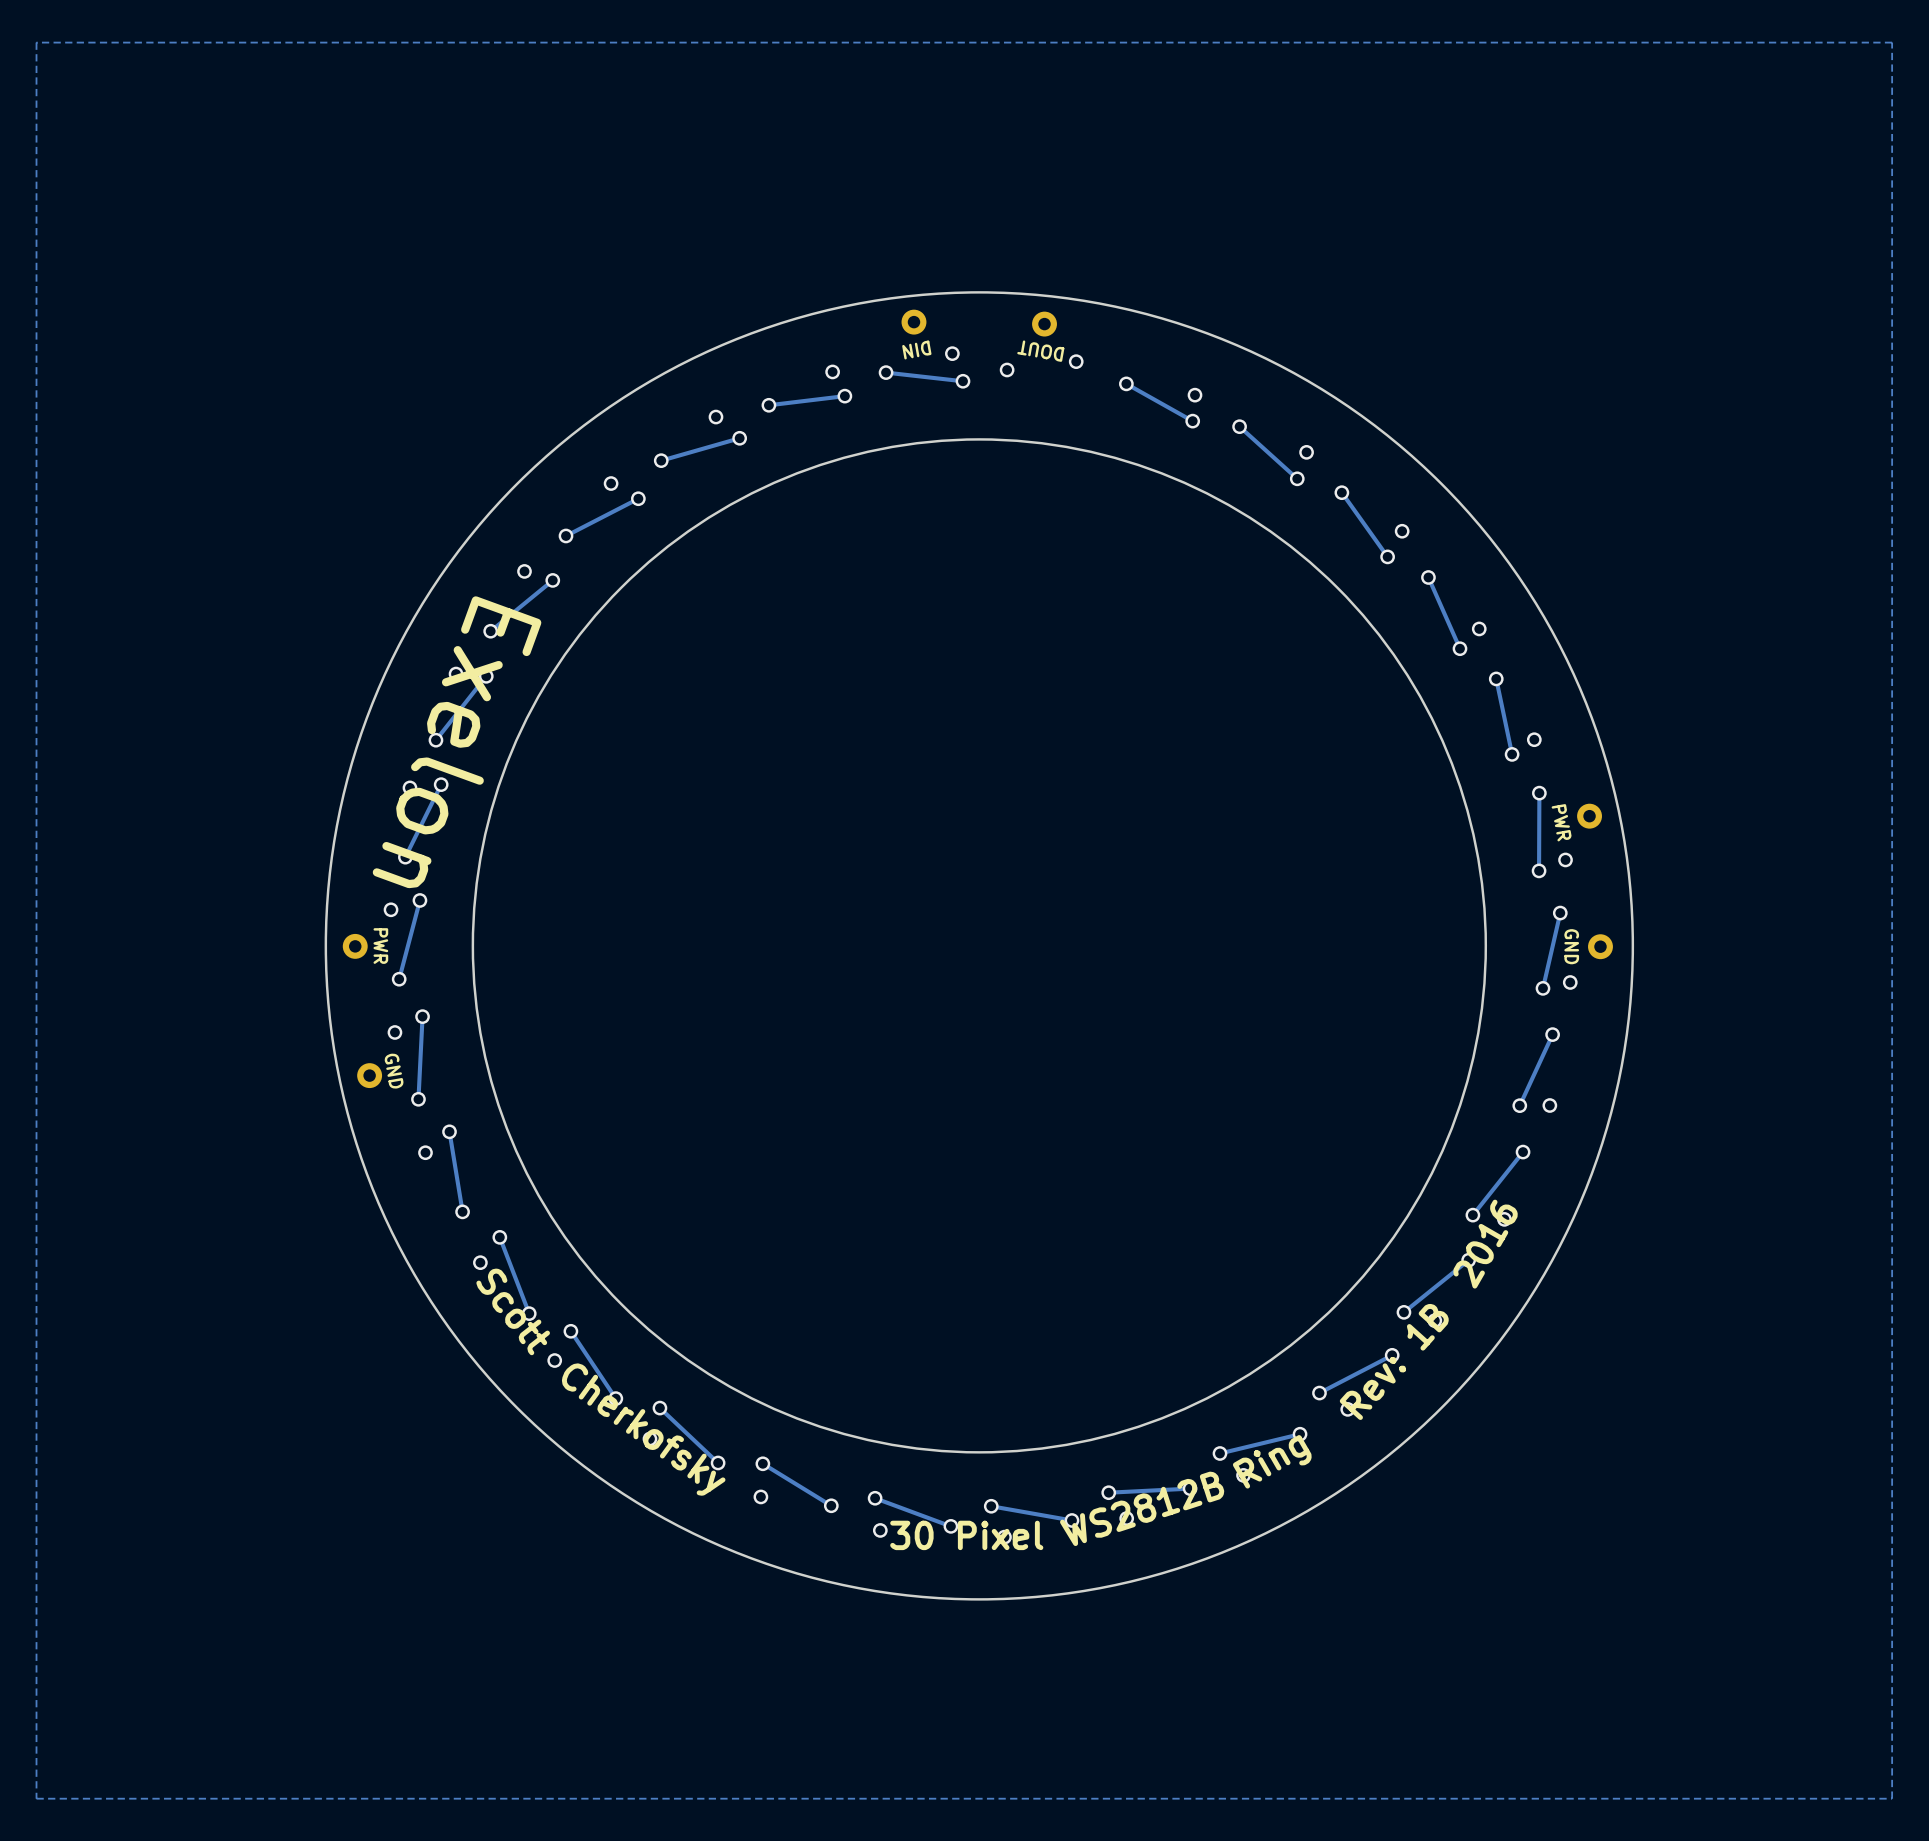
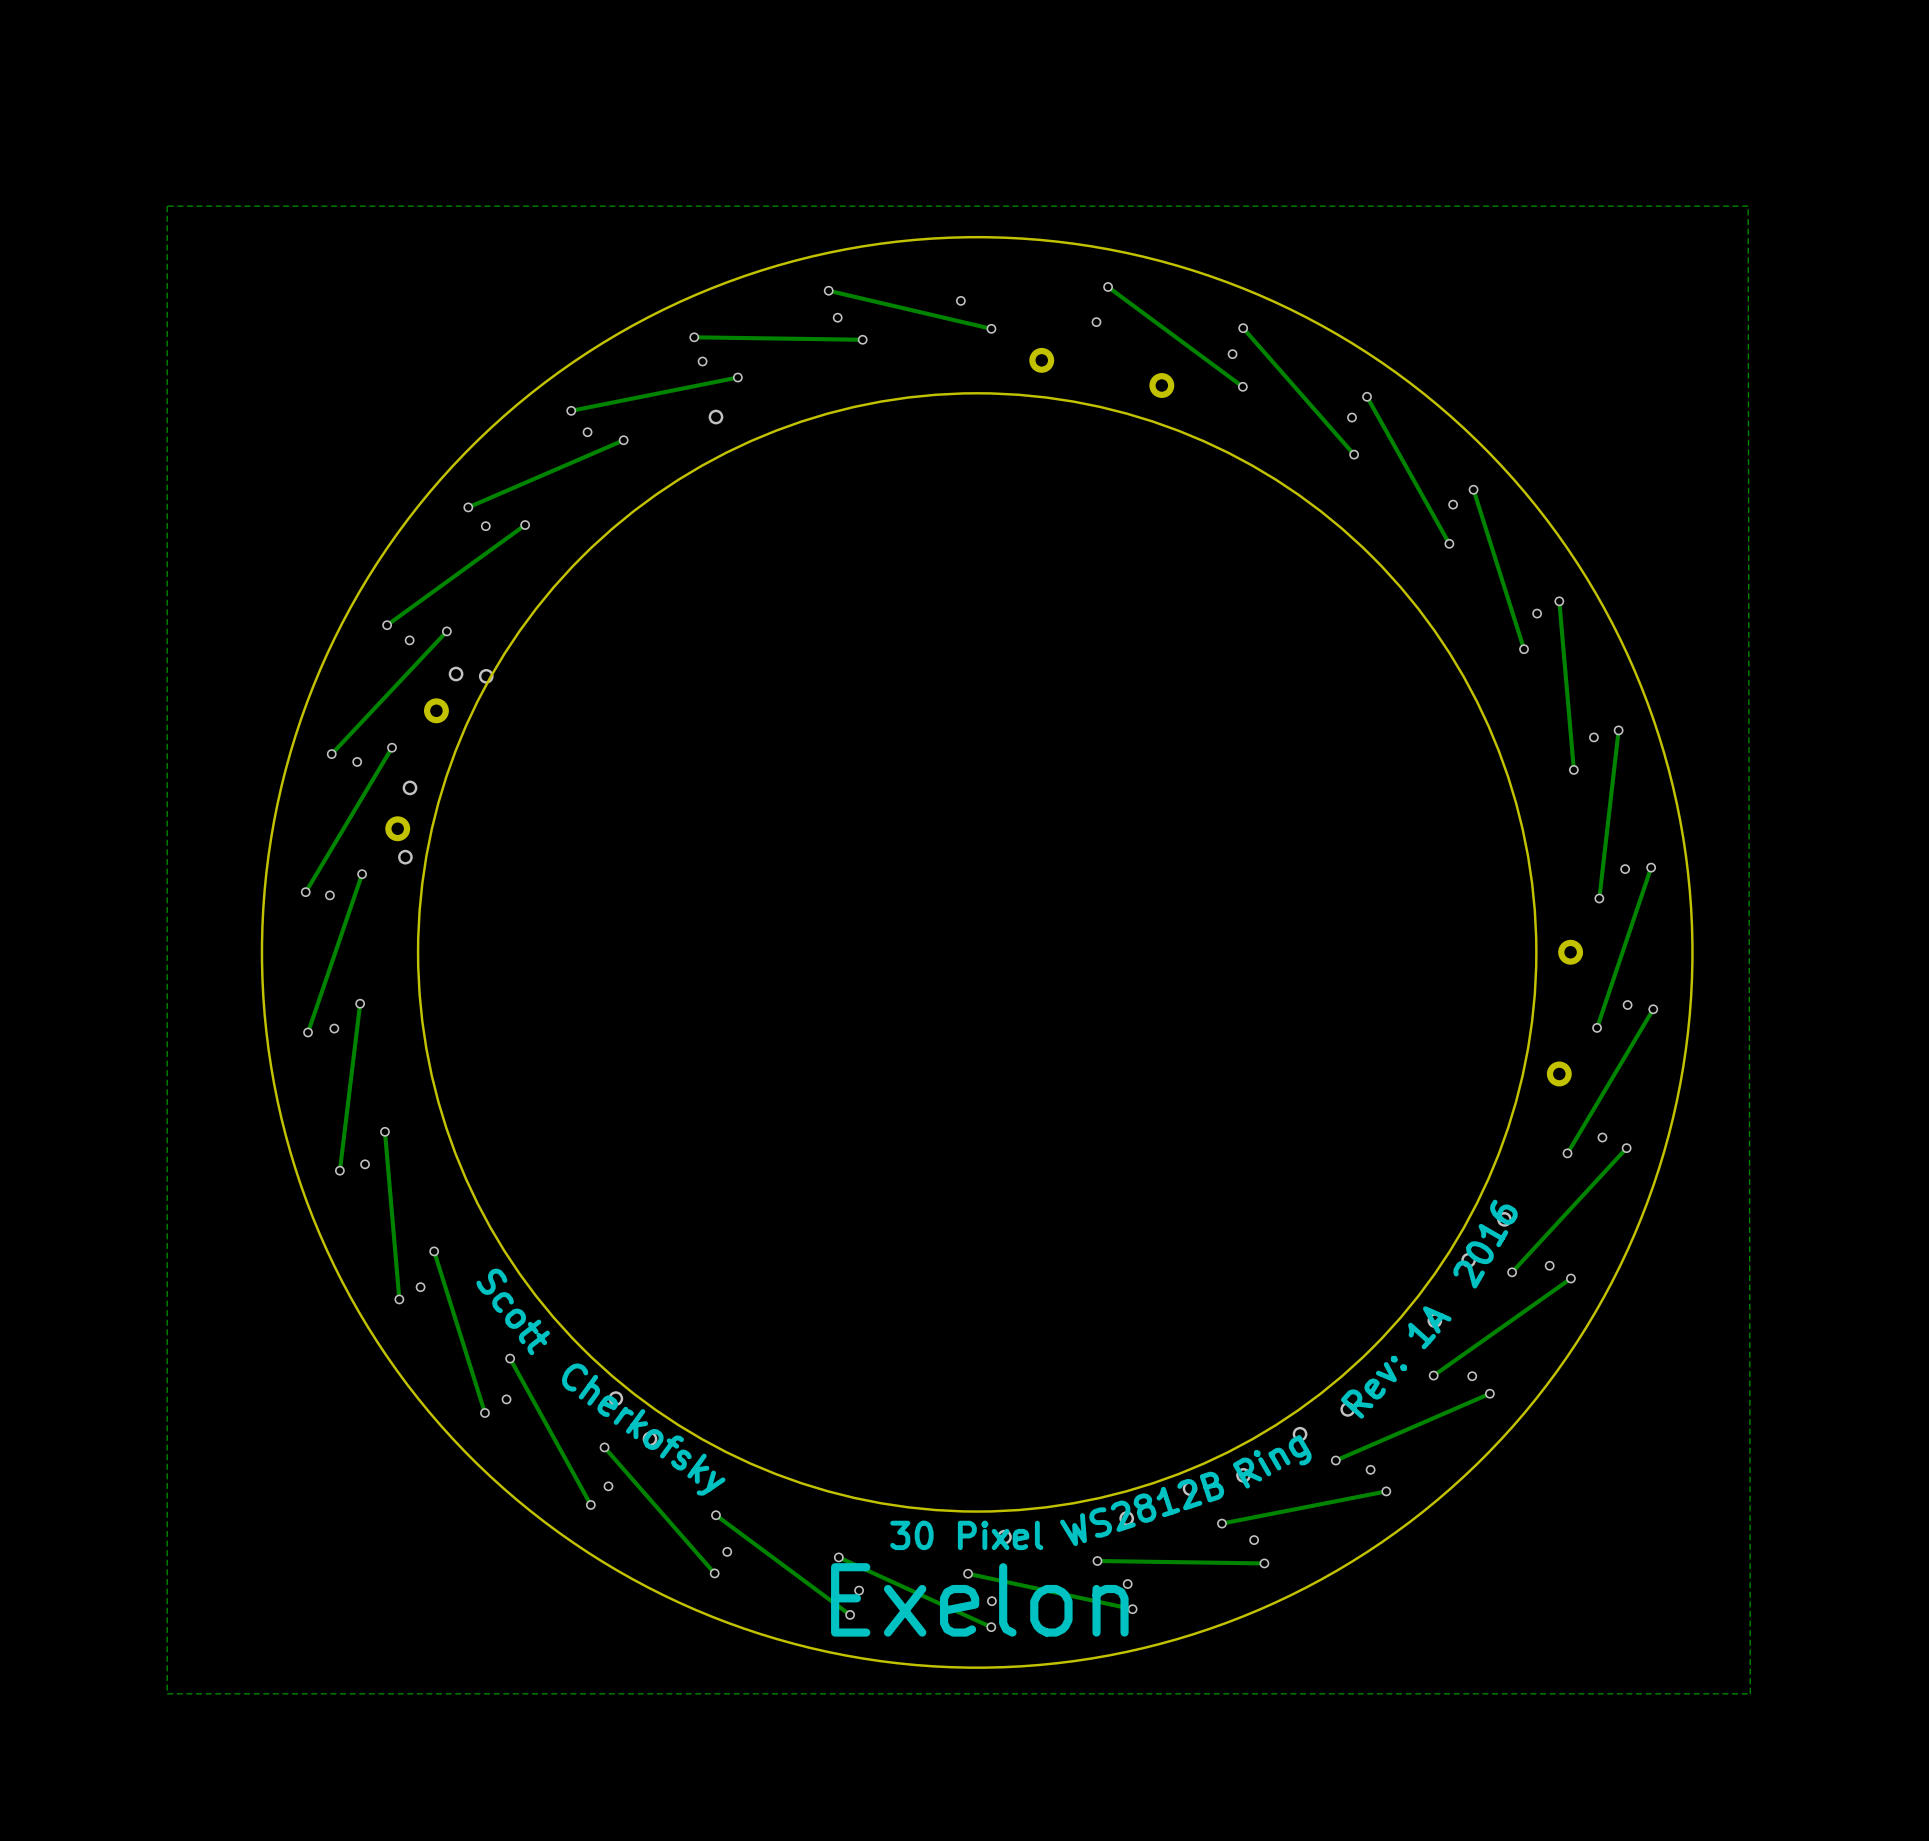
zone outline: (1892, 42) (1892, 1798) (36, 1798) (36, 42) (1892, 42) -> (1748, 206) (1750, 1693) (167, 1693) (167, 206) (1748, 206)
round board edge: none -> [260, 235, 1694, 1669]
track: none -> (1108, 287) (1242, 386)
via: none -> (1108, 287)
track: none -> (828, 290) (991, 328)
via: none -> (828, 290)
round board edge: [324, 291, 1635, 1601] -> none
via: none -> (960, 300)
via: none -> (837, 317)
part: (913, 322) -> none
via: none -> (1096, 322)
part position: (1044, 324) -> (1041, 360)
via: none -> (991, 328)
track: none -> (1243, 328) (1354, 454)
via: none -> (1243, 328)
track: none -> (694, 337) (862, 339)
via: none -> (694, 337)
via: none -> (862, 339)
text: DIN (916, 350) -> none
text: DOUT (1040, 351) -> none
via: (952, 353) -> none
via: none -> (1232, 354)
via: none -> (702, 361)
via: (1076, 361) -> none
via: (1007, 369) -> none
via: (832, 371) -> none
track: (886, 372) (963, 381) -> none
via: (886, 372) -> none
track: none -> (737, 377) (571, 410)
via: none -> (737, 377)
via: (963, 381) -> none
track: (1126, 383) (1192, 421) -> none
via: (1126, 383) -> none
part: none -> (1161, 385)
via: none -> (1242, 386)
round board edge: none -> [416, 392, 1538, 1513]
via: (1194, 395) -> none
track: (844, 396) (768, 405) -> none
via: (844, 396) -> none
track: none -> (1367, 396) (1449, 543)
via: none -> (1367, 396)
via: (768, 405) -> none
via: none -> (571, 410)
via: none -> (1351, 417)
via: (1192, 421) -> none
track: (1239, 426) (1297, 478) -> none
via: (1239, 426) -> none
via: none -> (587, 432)
round board edge: [471, 438, 1488, 1454] -> none
track: (739, 438) (661, 460) -> none
via: (739, 438) -> none
track: none -> (623, 440) (468, 507)
via: none -> (623, 440)
via: (1306, 452) -> none
via: none -> (1354, 454)
via: (661, 460) -> none
via: (1297, 478) -> none
via: (611, 483) -> none
track: none -> (1473, 489) (1524, 649)
via: none -> (1473, 489)
track: (1341, 492) (1387, 556) -> none
via: (1341, 492) -> none
track: (638, 498) (566, 535) -> none
via: (638, 498) -> none
via: none -> (1453, 504)
via: none -> (468, 507)
track: none -> (525, 525) (387, 625)
via: none -> (525, 525)
via: none -> (485, 526)
via: (1402, 531) -> none
via: (566, 535) -> none
via: none -> (1449, 543)
via: (1387, 556) -> none
via: (524, 571) -> none
track: (1428, 577) (1459, 648) -> none
via: (1428, 577) -> none
track: (552, 580) (490, 631) -> none
via: (552, 580) -> none
track: none -> (1559, 601) (1573, 769)
via: none -> (1559, 601)
via: none -> (1537, 613)
via: none -> (387, 625)
via: (1479, 628) -> none
track: none -> (446, 631) (331, 754)
via: none -> (446, 631)
via: (490, 631) -> none
via: none -> (409, 640)
via: (1459, 648) -> none
via: none -> (1524, 649)
track: (486, 676) (435, 740) -> none
track: (1496, 678) (1512, 754) -> none
via: (1496, 678) -> none
part: none -> (436, 710)
track: none -> (1618, 730) (1599, 898)
via: none -> (1618, 730)
via: none -> (1593, 737)
via: (1534, 739) -> none
via: (435, 740) -> none
text: Exelon (457, 742) -> none
track: none -> (392, 747) (305, 892)
via: none -> (392, 747)
via: none -> (331, 754)
via: (1512, 754) -> none
via: none -> (357, 761)
via: none -> (1573, 769)
track: (441, 784) (405, 857) -> none
via: (441, 784) -> none
track: (1539, 793) (1539, 870) -> none
via: (1539, 793) -> none
part: (1589, 816) -> none
text: PWR (1561, 822) -> none
part: none -> (397, 828)
via: (1565, 859) -> none
track: none -> (1651, 867) (1597, 1027)
via: none -> (1651, 867)
via: none -> (1625, 869)
via: (1539, 870) -> none
track: none -> (362, 874) (308, 1032)
via: none -> (362, 874)
via: none -> (305, 892)
via: none -> (329, 895)
via: none -> (1599, 898)
track: (419, 900) (399, 979) -> none
via: (419, 900) -> none
via: (391, 909) -> none
track: (1560, 913) (1542, 988) -> none
via: (1560, 913) -> none
part: (355, 946) -> none
text: PWR (380, 946) -> none
text: GND (1571, 946) -> none
part position: (1600, 946) -> (1570, 952)
via: (399, 979) -> none
via: (1570, 982) -> none
via: (1542, 988) -> none
track: none -> (360, 1003) (339, 1170)
via: none -> (360, 1003)
via: none -> (1627, 1005)
track: none -> (1653, 1009) (1567, 1153)
via: none -> (1653, 1009)
track: (422, 1016) (418, 1099) -> none
via: (422, 1016) -> none
via: none -> (1597, 1027)
via: none -> (334, 1028)
via: none -> (308, 1032)
via: (394, 1032) -> none
track: (1552, 1034) (1519, 1105) -> none
via: (1552, 1034) -> none
text: GND (394, 1071) -> none
part: none -> (1559, 1073)
part: (369, 1075) -> none
via: (418, 1099) -> none
via: (1519, 1105) -> none
via: (1549, 1105) -> none
track: none -> (384, 1131) (399, 1299)
via: none -> (384, 1131)
track: (449, 1131) (462, 1211) -> none
via: (449, 1131) -> none
via: none -> (1602, 1137)
track: none -> (1626, 1148) (1512, 1272)
via: none -> (1626, 1148)
via: (425, 1152) -> none
track: (1523, 1152) (1472, 1215) -> none
via: (1523, 1152) -> none
via: none -> (1567, 1153)
via: none -> (365, 1164)
via: none -> (339, 1170)
via: (462, 1211) -> none
via: (1472, 1215) -> none
track: (499, 1237) (529, 1313) -> none
via: (499, 1237) -> none
track: none -> (434, 1251) (484, 1412)
via: none -> (434, 1251)
track: (1468, 1260) (1403, 1312) -> none
via: (480, 1262) -> none
via: none -> (1549, 1265)
via: none -> (1512, 1272)
track: none -> (1570, 1278) (1433, 1375)
via: none -> (1570, 1278)
via: none -> (420, 1287)
via: none -> (399, 1299)
via: (1403, 1312) -> none
via: (529, 1313) -> none
track: (570, 1331) (615, 1398) -> none
via: (570, 1331) -> none
track: (1392, 1355) (1319, 1393) -> none
via: (1392, 1355) -> none
track: none -> (510, 1358) (590, 1504)
via: none -> (510, 1358)
via: (554, 1360) -> none
text: Rev: 1B (1394, 1361) -> Rev: 1A (1396, 1362)
via: none -> (1433, 1375)
via: none -> (1472, 1376)
via: (1319, 1393) -> none
track: none -> (1489, 1393) (1335, 1460)
via: none -> (1489, 1393)
via: none -> (506, 1399)
track: (659, 1408) (718, 1462) -> none
via: (659, 1408) -> none
via: none -> (484, 1412)
track: (1300, 1434) (1219, 1453) -> none
track: none -> (604, 1447) (714, 1573)
via: none -> (604, 1447)
via: (1219, 1453) -> none
via: none -> (1335, 1460)
via: (718, 1462) -> none
track: (762, 1463) (831, 1505) -> none
via: (762, 1463) -> none
via: none -> (1370, 1469)
via: none -> (608, 1486)
track: (1190, 1488) (1108, 1492) -> none
track: none -> (1386, 1491) (1221, 1523)
via: none -> (1386, 1491)
via: (1108, 1492) -> none
via: (760, 1496) -> none
track: (875, 1498) (950, 1526) -> none
via: (875, 1498) -> none
via: none -> (590, 1504)
via: (831, 1505) -> none
track: (991, 1506) (1071, 1520) -> none
via: (991, 1506) -> none
track: none -> (715, 1515) (850, 1614)
via: none -> (715, 1515)
via: (1071, 1520) -> none
via: none -> (1221, 1523)
via: (950, 1526) -> none
via: (880, 1530) -> none
via: none -> (1254, 1540)
via: none -> (727, 1551)
track: none -> (838, 1557) (991, 1627)
via: none -> (838, 1557)
track: none -> (1097, 1560) (1264, 1563)
via: none -> (1097, 1560)
via: none -> (1264, 1563)
via: none -> (714, 1573)
track: none -> (968, 1573) (1132, 1609)
via: none -> (968, 1573)
via: none -> (1127, 1584)
via: none -> (859, 1590)
text: none -> Exelon (979, 1599)
via: none -> (991, 1601)
via: none -> (1132, 1609)
via: none -> (850, 1614)
via: none -> (991, 1627)

